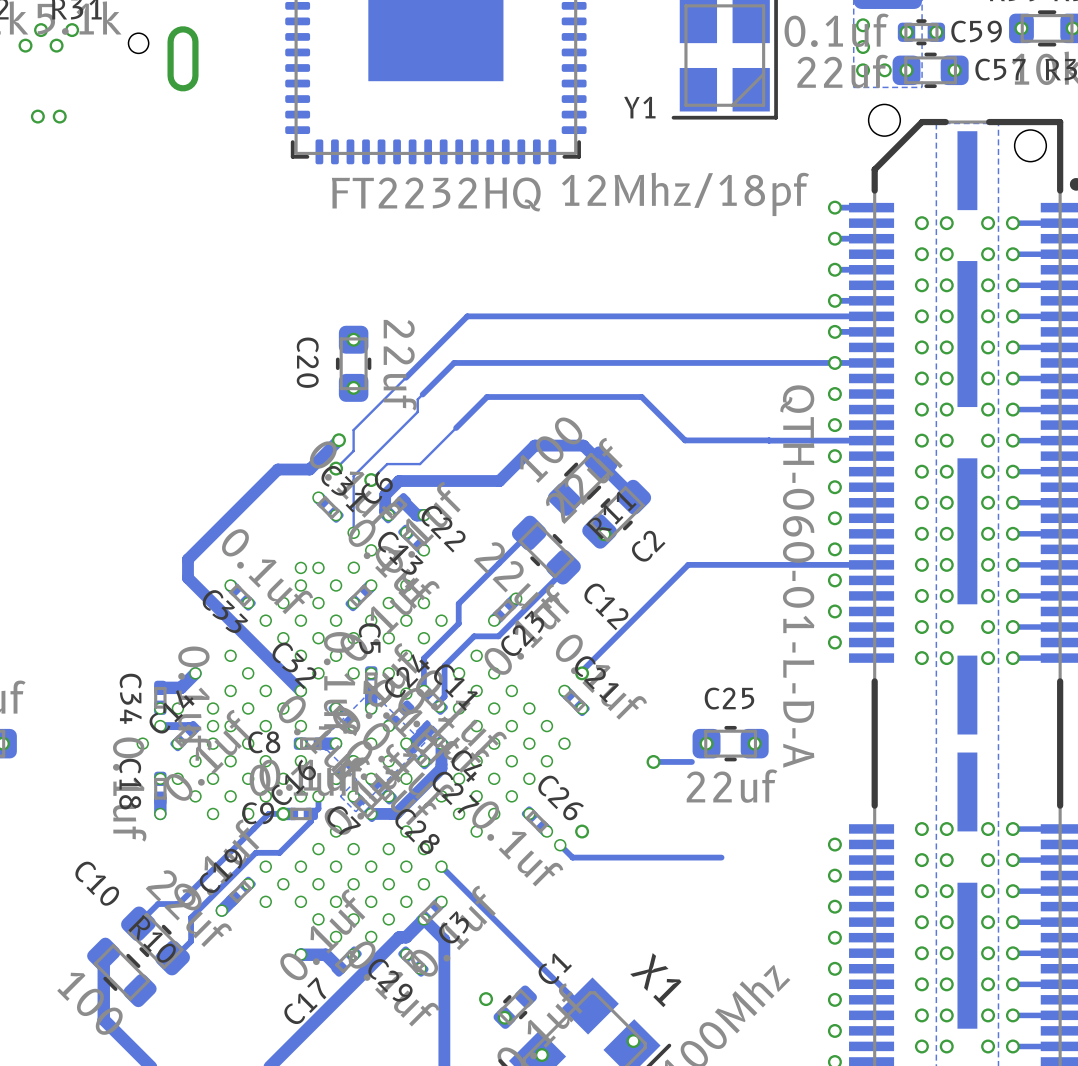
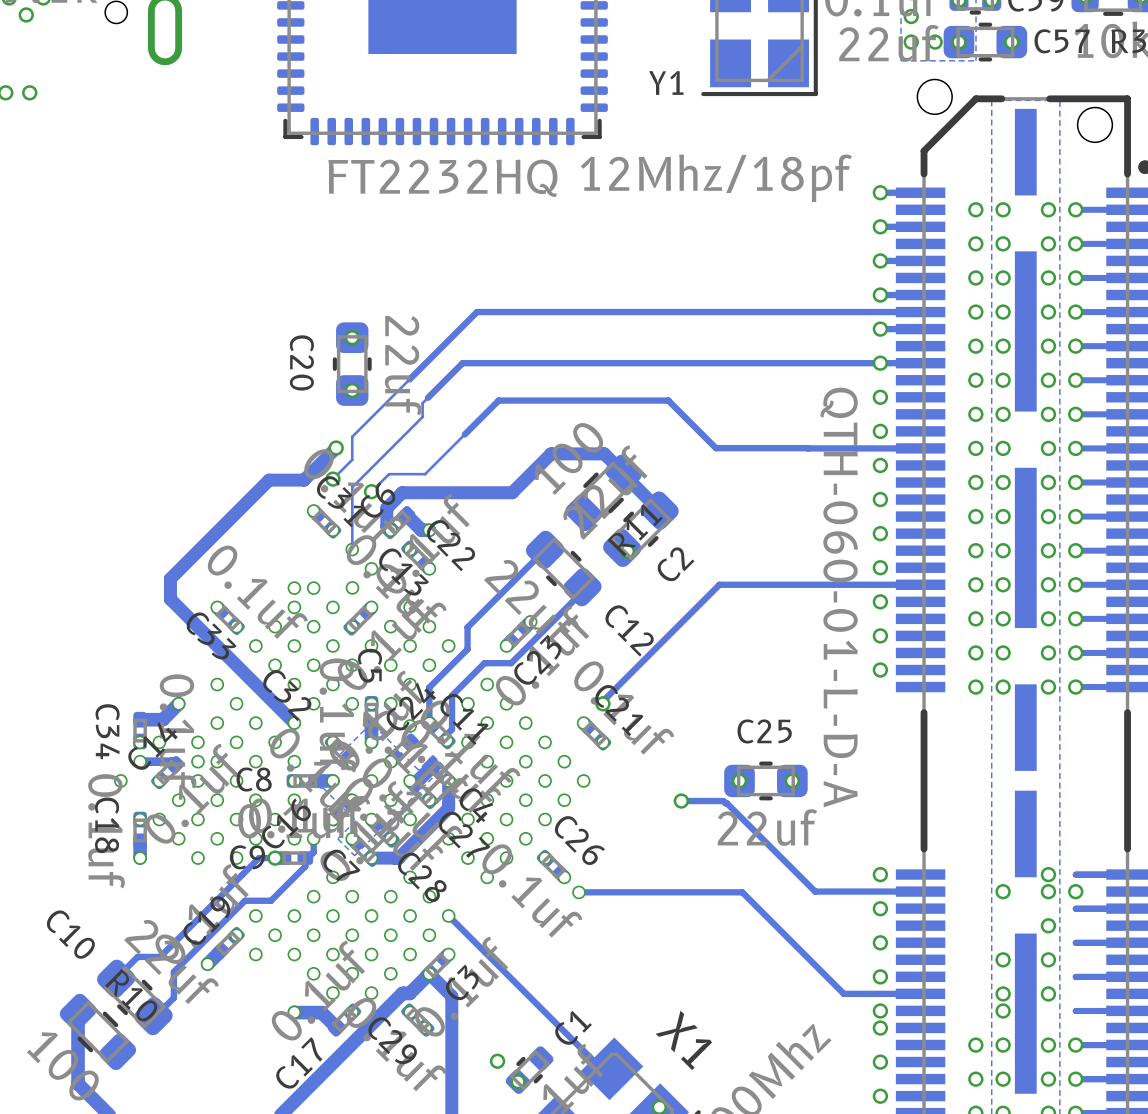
track: none -> (723, 801) (815, 891) (920, 891)
via: none -> (880, 874)
via: (921, 829) -> none
via: (946, 829) -> none
via: (1012, 829) -> none
via: (582, 831) -> none
via: (834, 844) -> none
via: none -> (1003, 891)
via: none -> (1048, 891)
via: none -> (1075, 891)
track: (560, 845) (572, 857) (721, 857) -> (579, 892) (742, 892) (843, 993) (920, 993)
via: none -> (880, 908)
via: (921, 860) -> none
via: (946, 860) -> none
via: (988, 860) -> none
via: (1012, 860) -> none
via: (834, 875) -> none
via: none -> (1048, 925)
via: none -> (880, 942)
via: (921, 891) -> none
via: (946, 891) -> none
via: (988, 891) -> none
via: (1012, 891) -> none
via: (834, 906) -> none
via: none -> (1003, 959)
via: none -> (1048, 959)
via: none -> (880, 976)
via: (921, 922) -> none
via: (946, 922) -> none
via: (988, 922) -> none
via: (1012, 922) -> none
via: (834, 937) -> none
via: none -> (1003, 993)
via: none -> (1048, 993)
via: none -> (880, 1010)
via: (921, 953) -> none
via: (988, 953) -> none
via: (1012, 953) -> none

